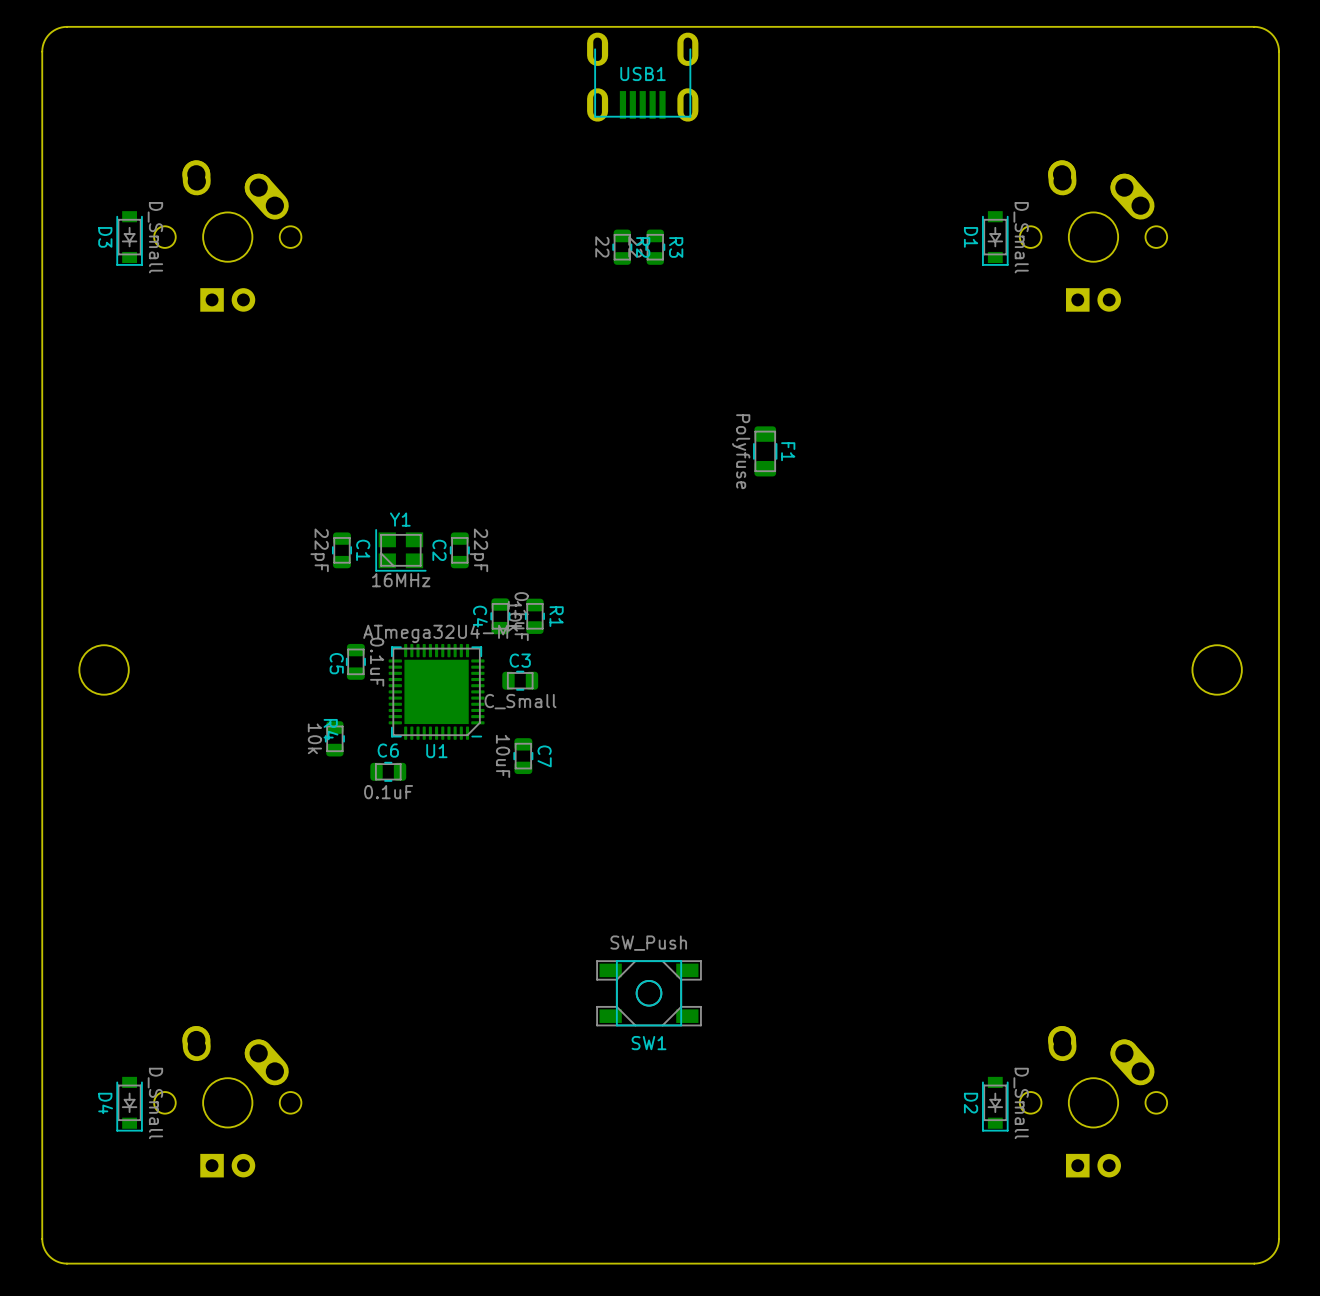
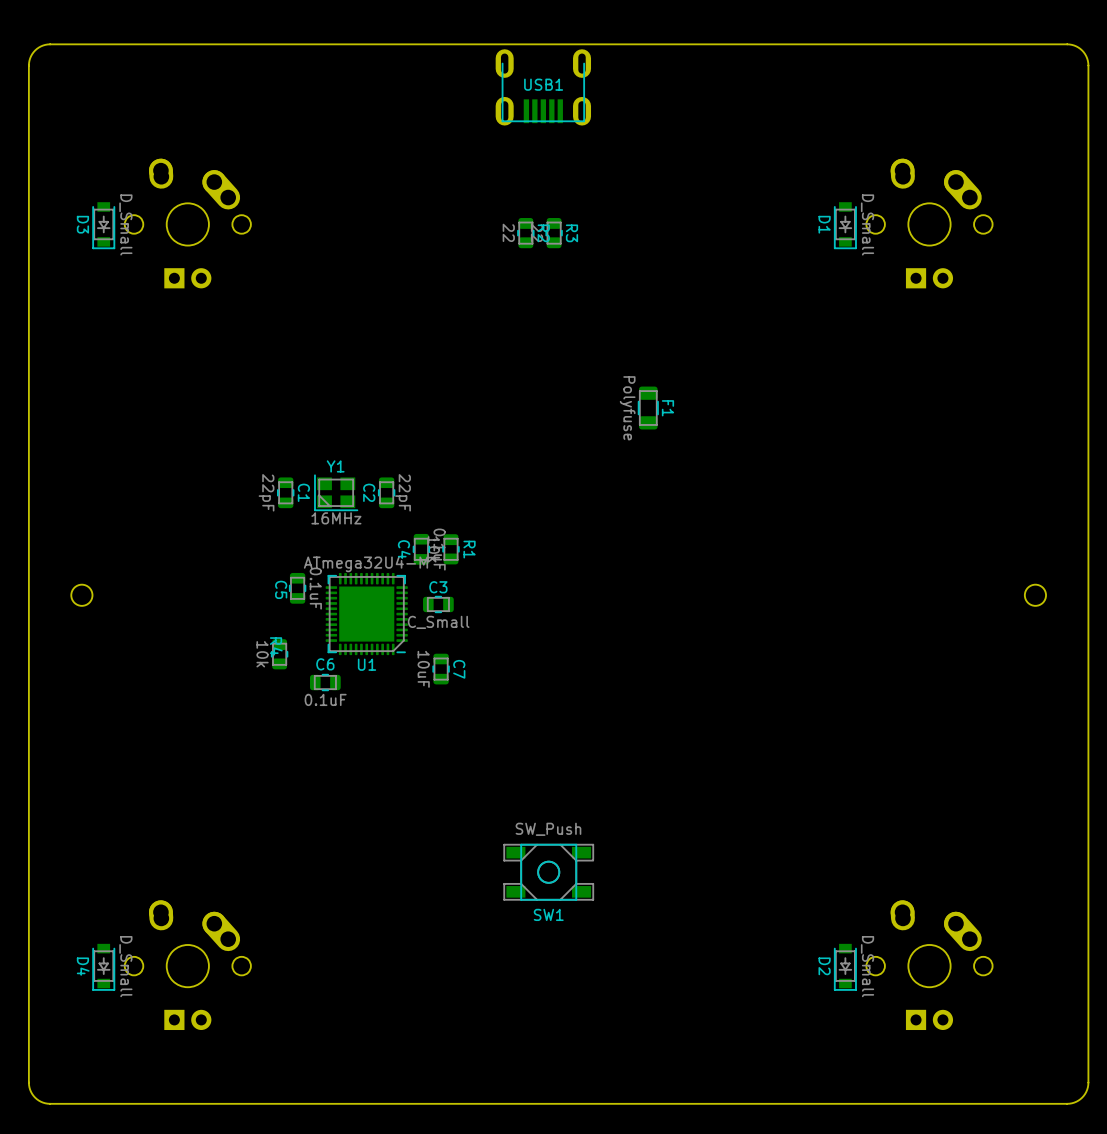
round board edge size: [78, 644, 130, 696] -> [70, 583, 94, 607]
round board edge size: [1191, 644, 1243, 696] -> [1024, 583, 1047, 607]

